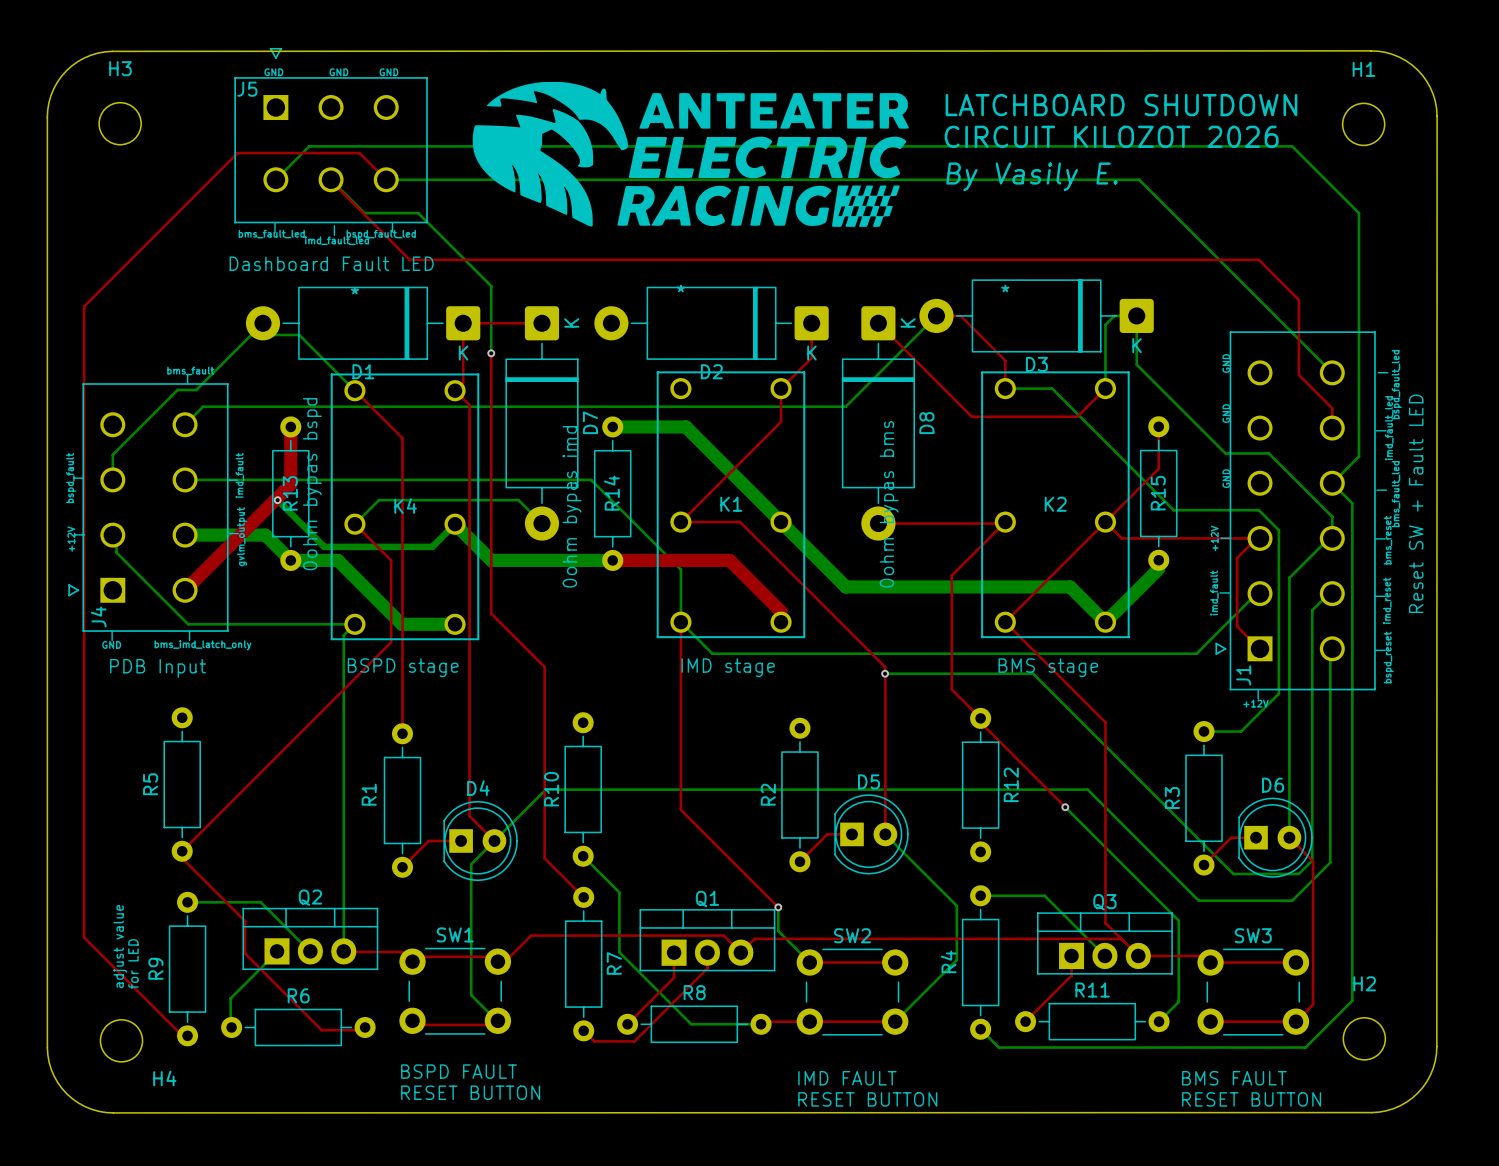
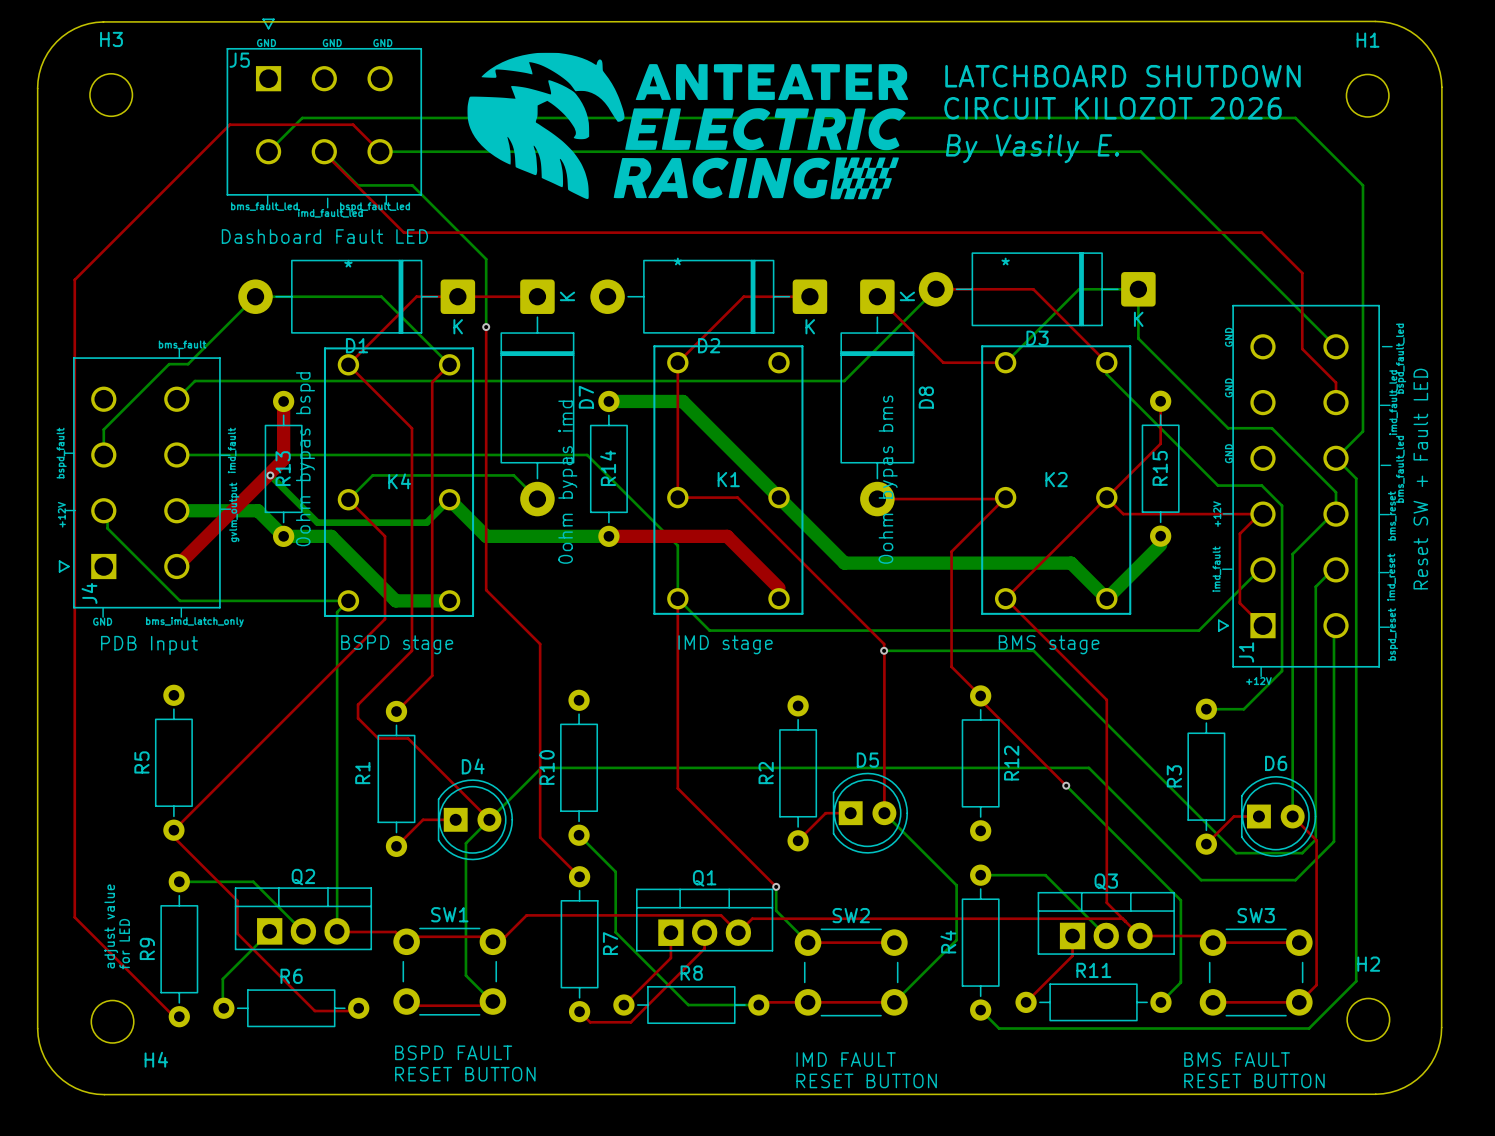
top track: (960, 315) (1005, 360) (1005, 383) -> none
bottom track: (1114, 315) (1105, 324) (1105, 388) -> (1115, 289) (1079, 289) (1005, 362)
bottom track: (262, 323) (274, 334) (299, 334) (354, 390) -> (255, 296) (381, 296) (449, 364)
top track: (463, 323) (463, 382) (458, 386) -> (457, 296) (416, 296) (348, 364)
top track: (811, 323) (811, 357) (781, 388) (781, 421) (680, 522) -> (809, 296) (743, 296) (677, 362)
top track: (943, 388) (971, 416) (1077, 416) (1105, 388) -> (960, 289) (1033, 289) (1106, 362)
top track: none -> (943, 362) (1005, 362)
bottom track: (1005, 388) (1052, 388) (1173, 510) (1215, 510) -> (1106, 362) (1106, 374) (1217, 485)
top track: none -> (677, 368) (677, 497)
top track: (458, 394) (469, 405) (469, 816) -> (396, 412) (412, 428) (412, 650) (358, 704) (358, 718) (378, 738) (408, 738) (464, 794)
top track: (402, 438) (402, 733) -> (449, 364) (432, 382) (432, 675) (396, 711)

